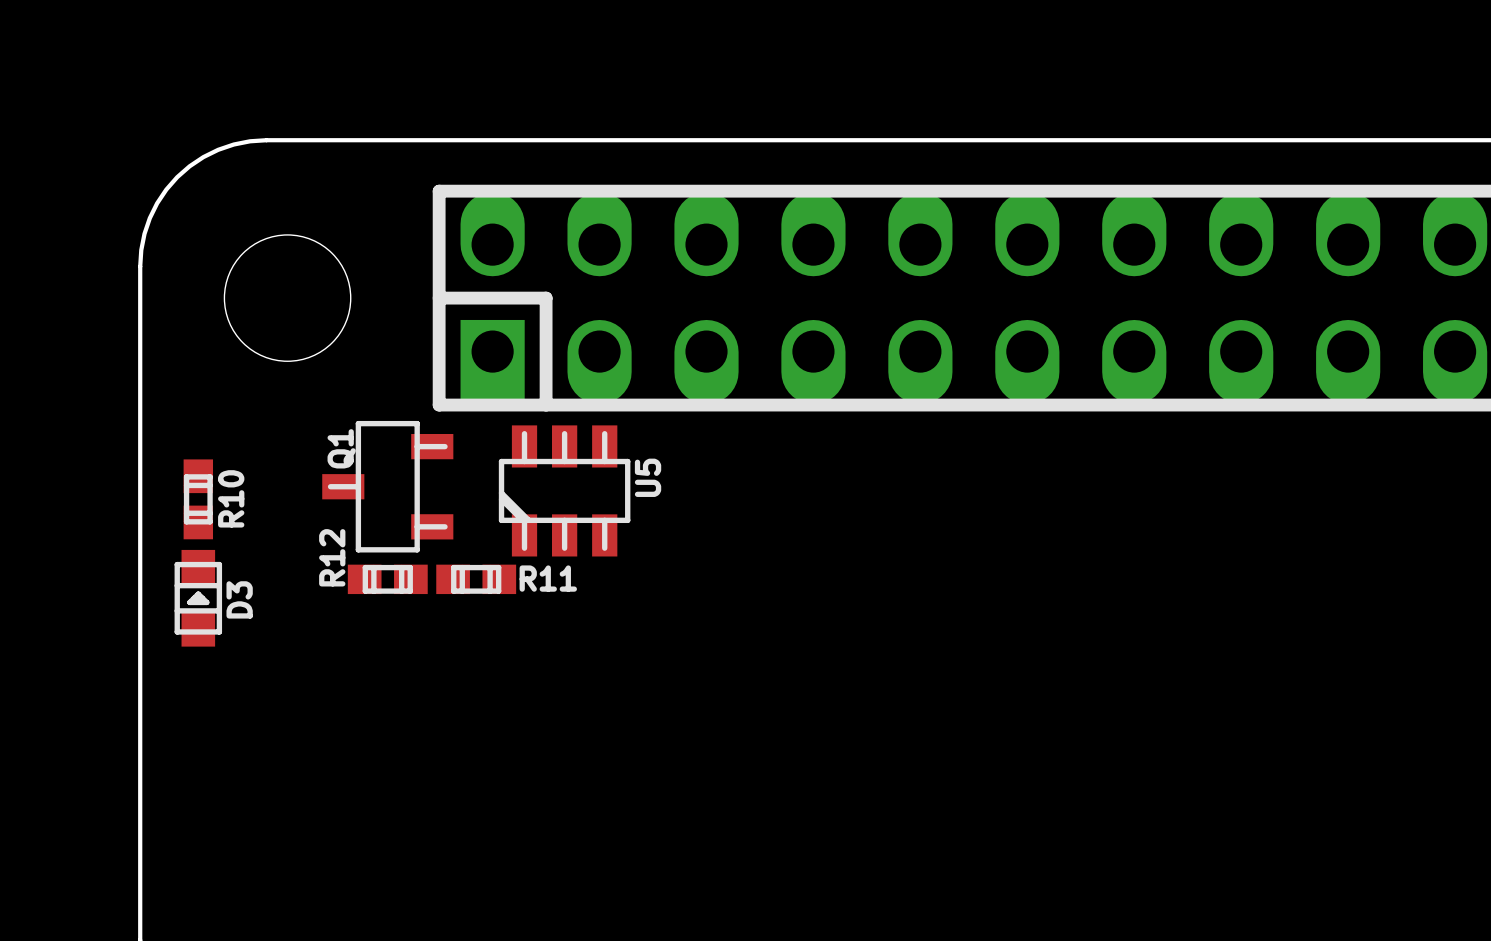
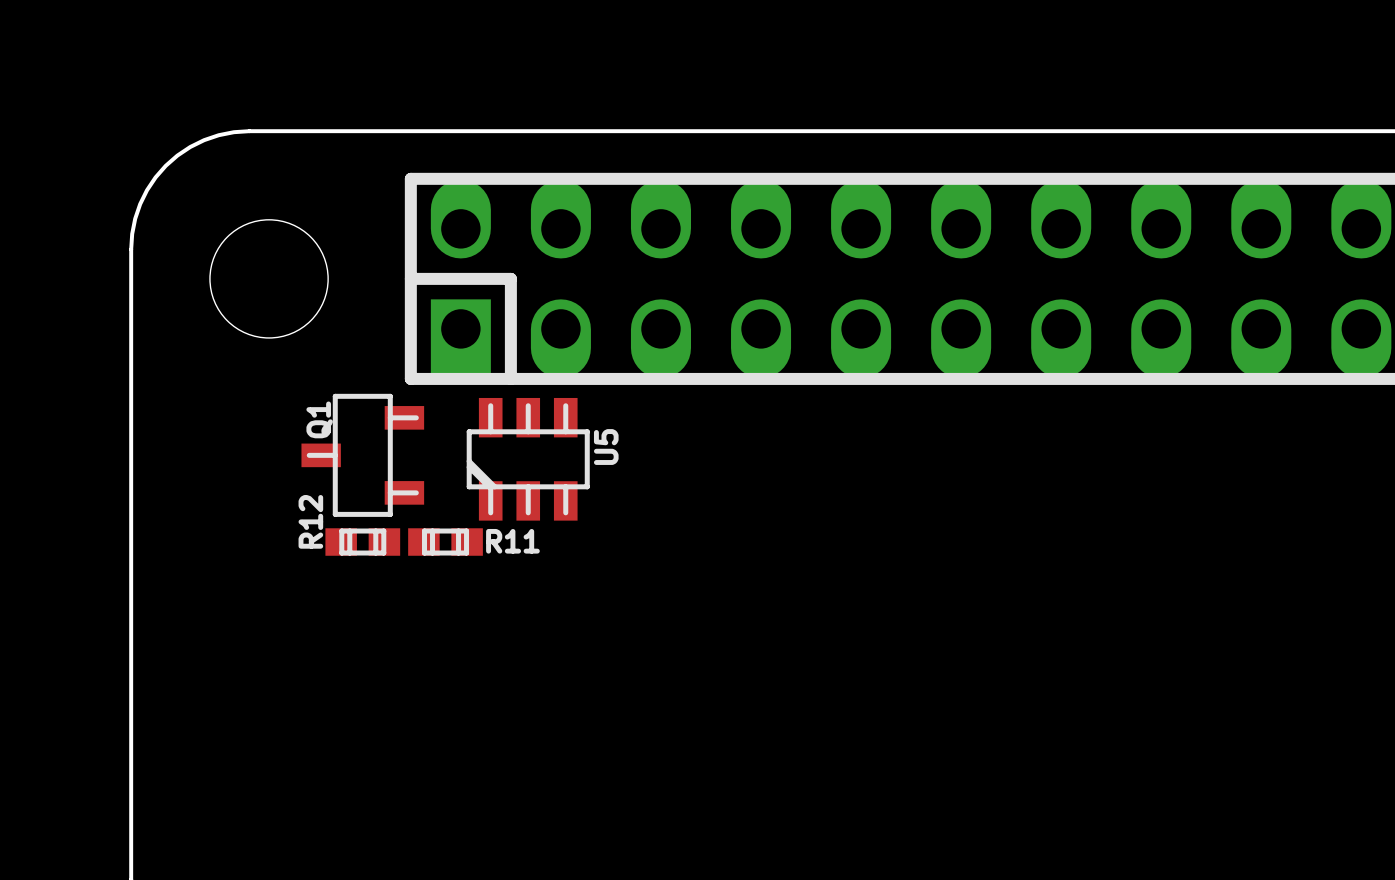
R10: (198, 499) -> none
D3: (198, 598) -> none

